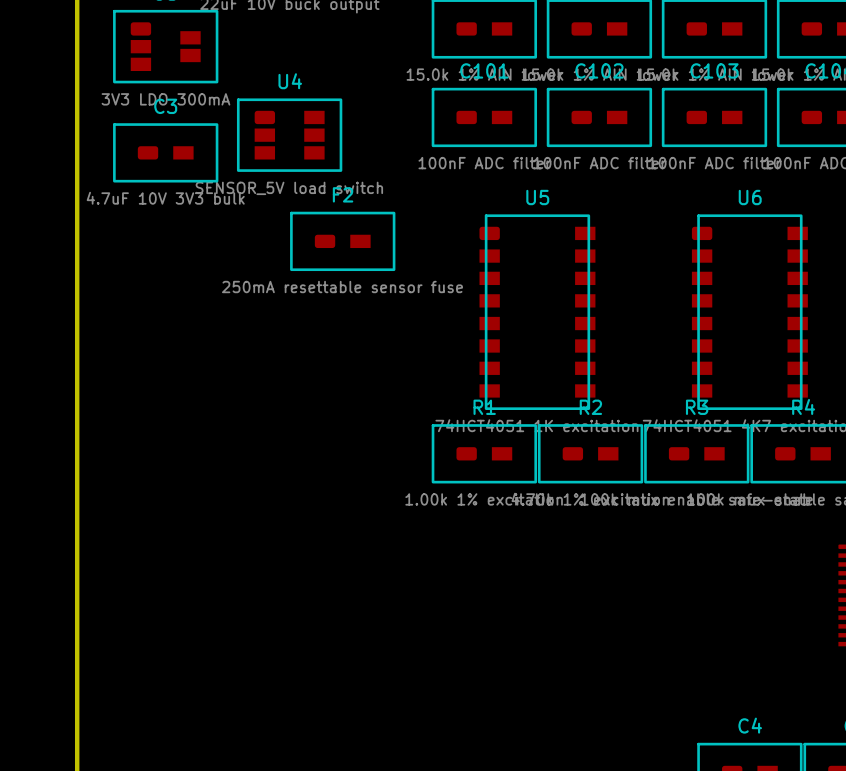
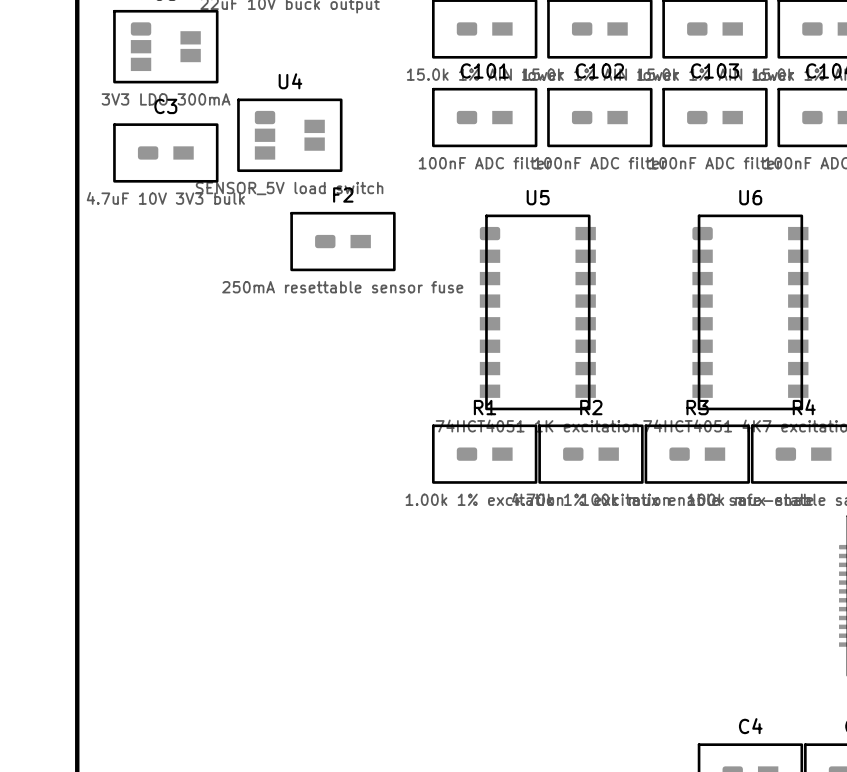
U4 footprint: [236, 98, 343, 172] -> [237, 98, 343, 173]

